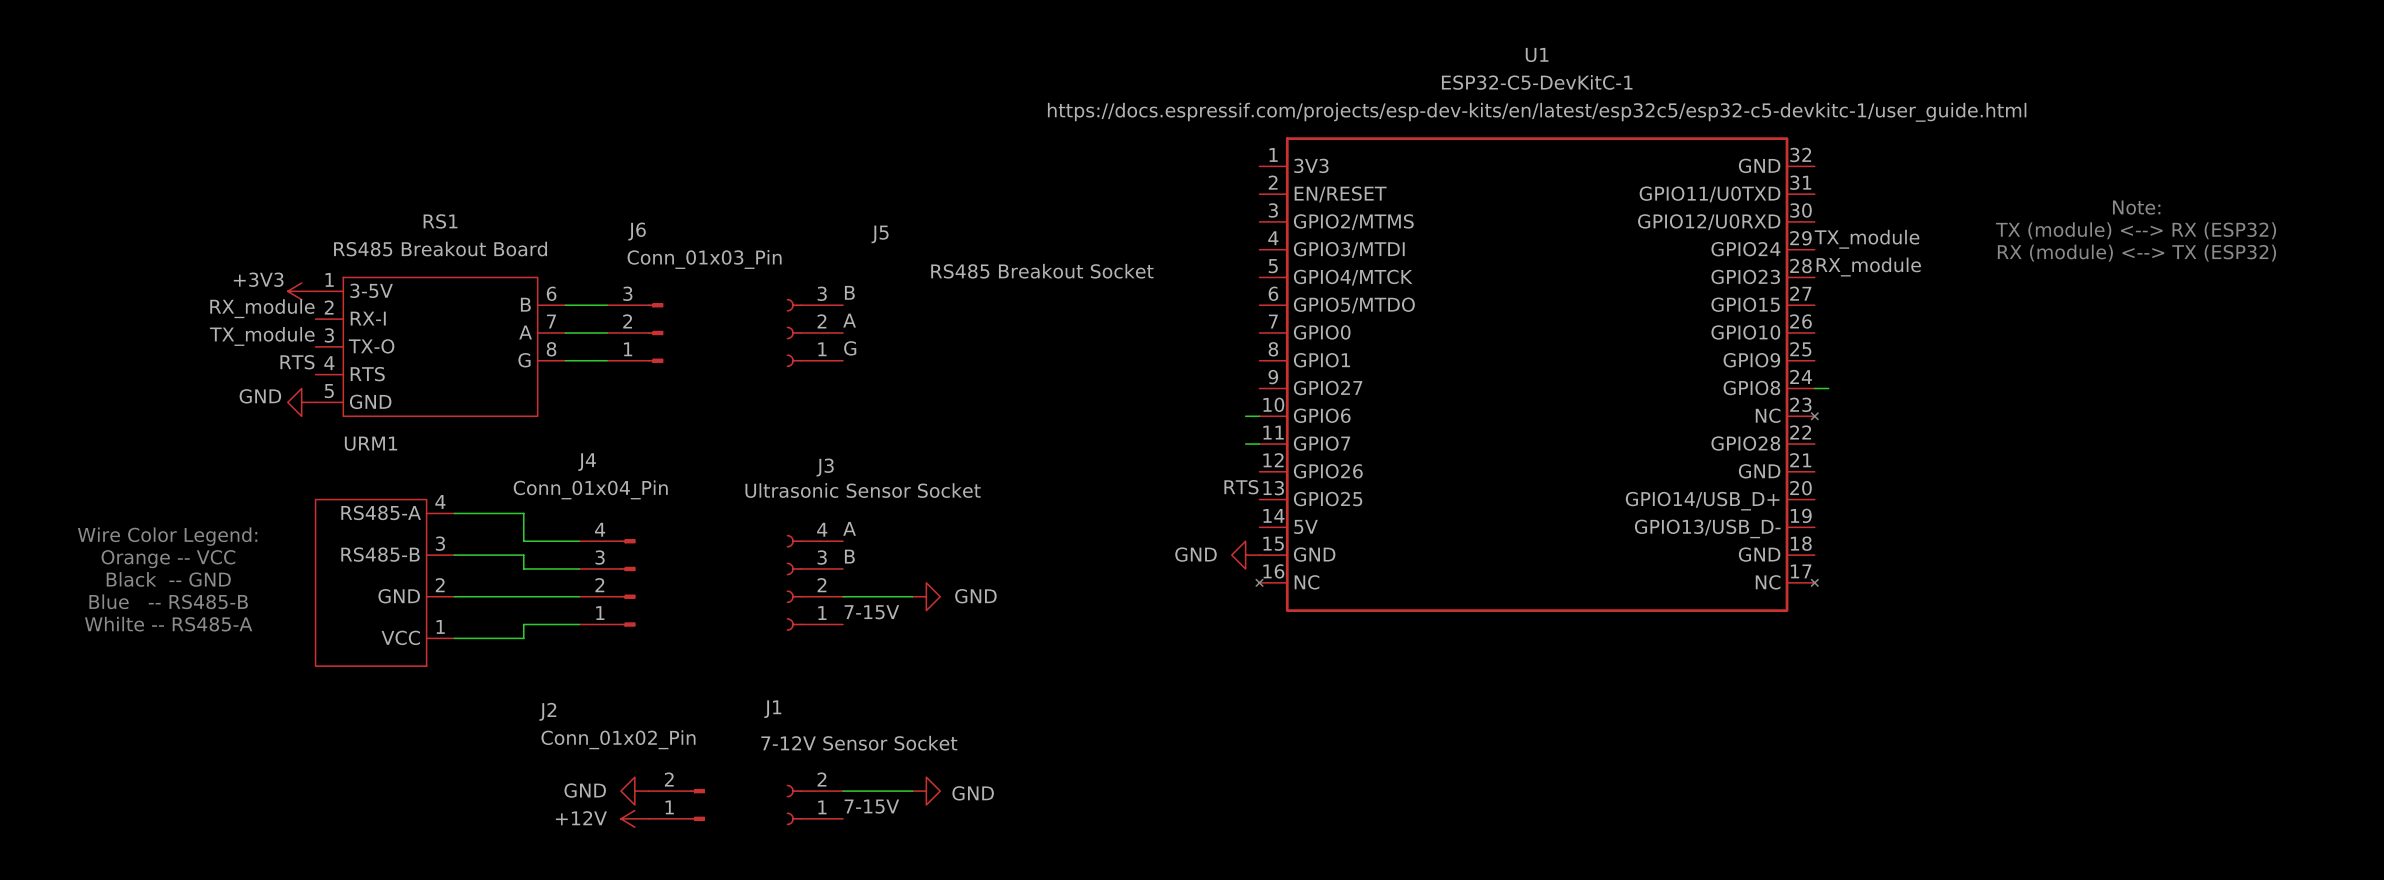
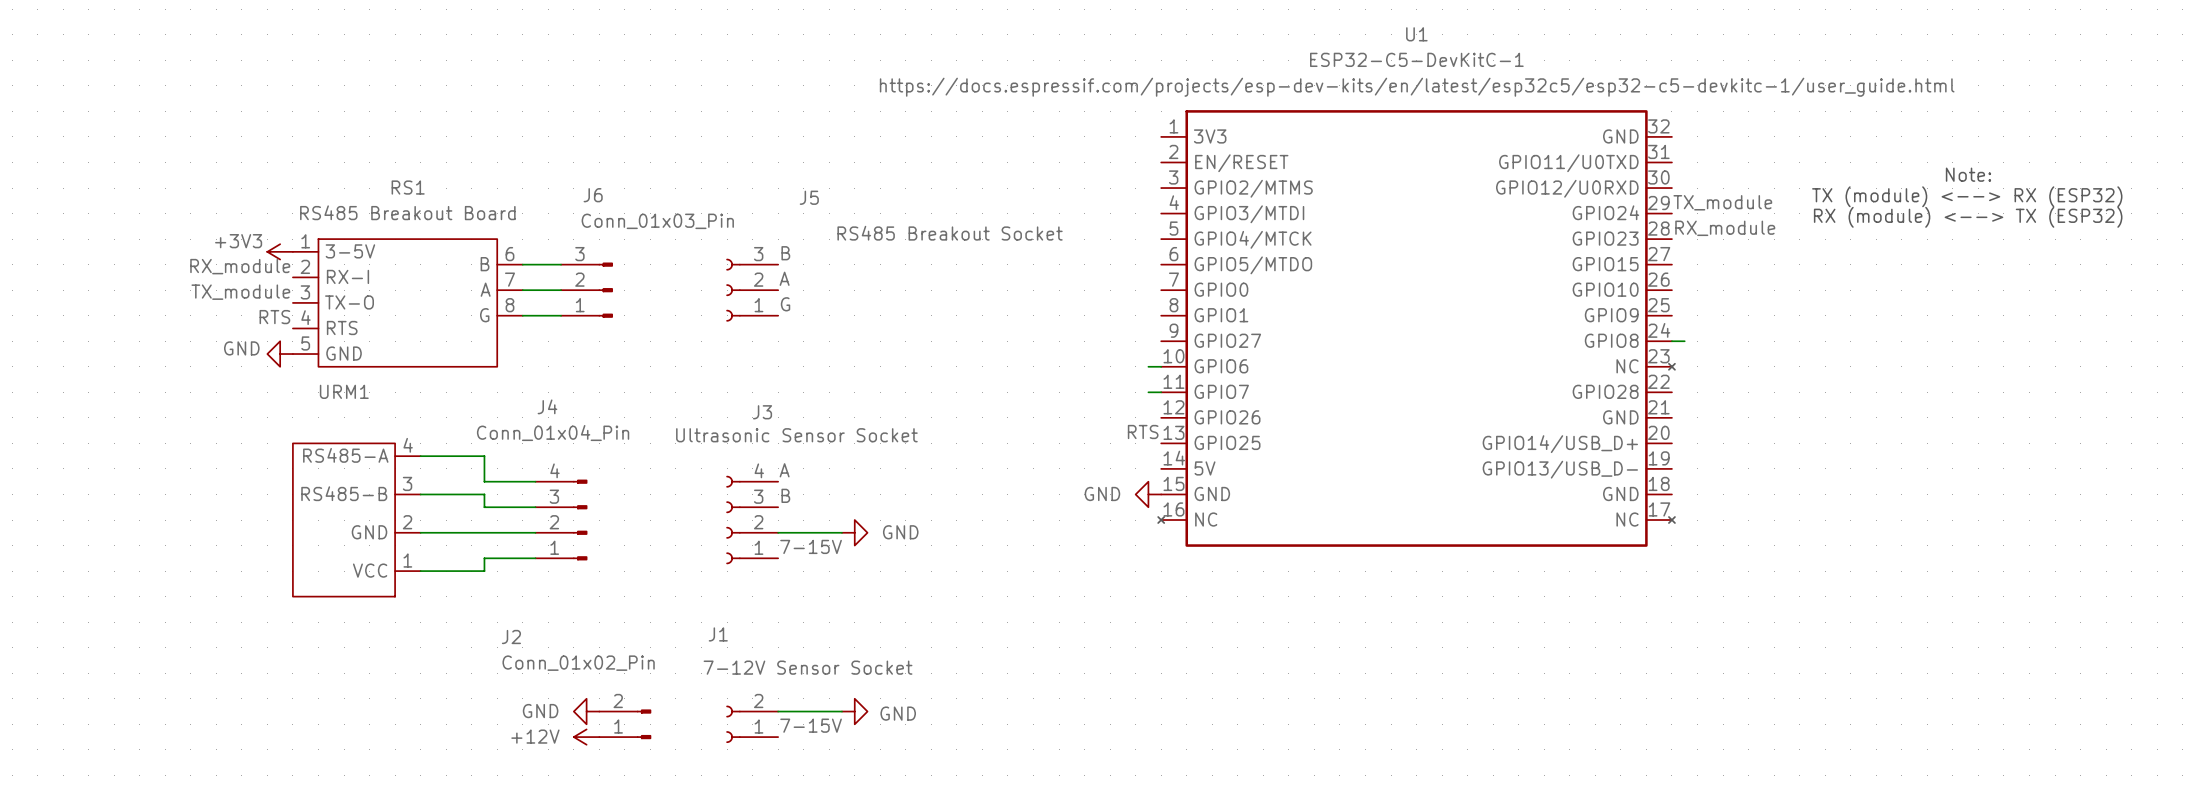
text: Wire Color Legend: (167, 536) -> none
text: Orange -- VCC (168, 559) -> none
text: Black -- GND (168, 579) -> none
text: Blue -- RS485-B (168, 601) -> none
text: Whilte -- RS485-A (168, 624) -> none

